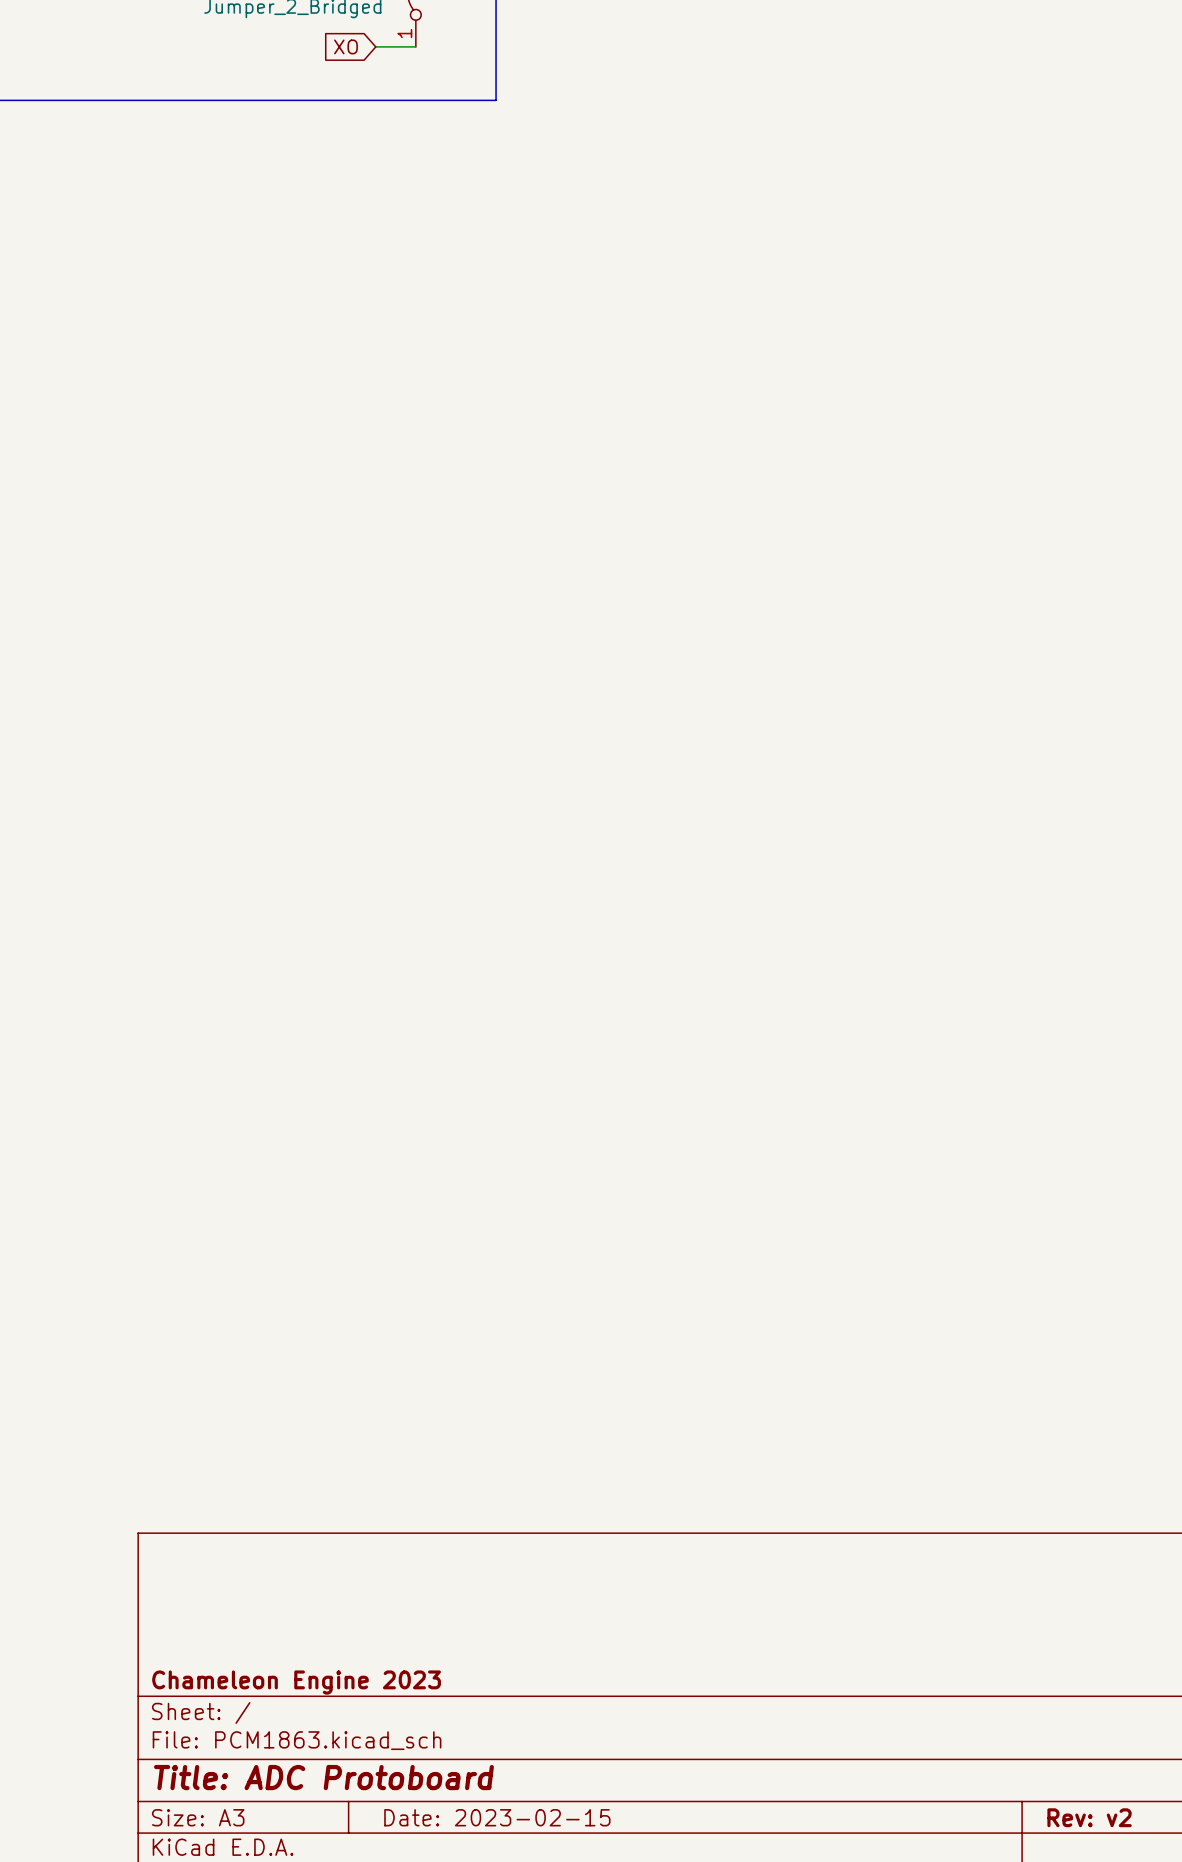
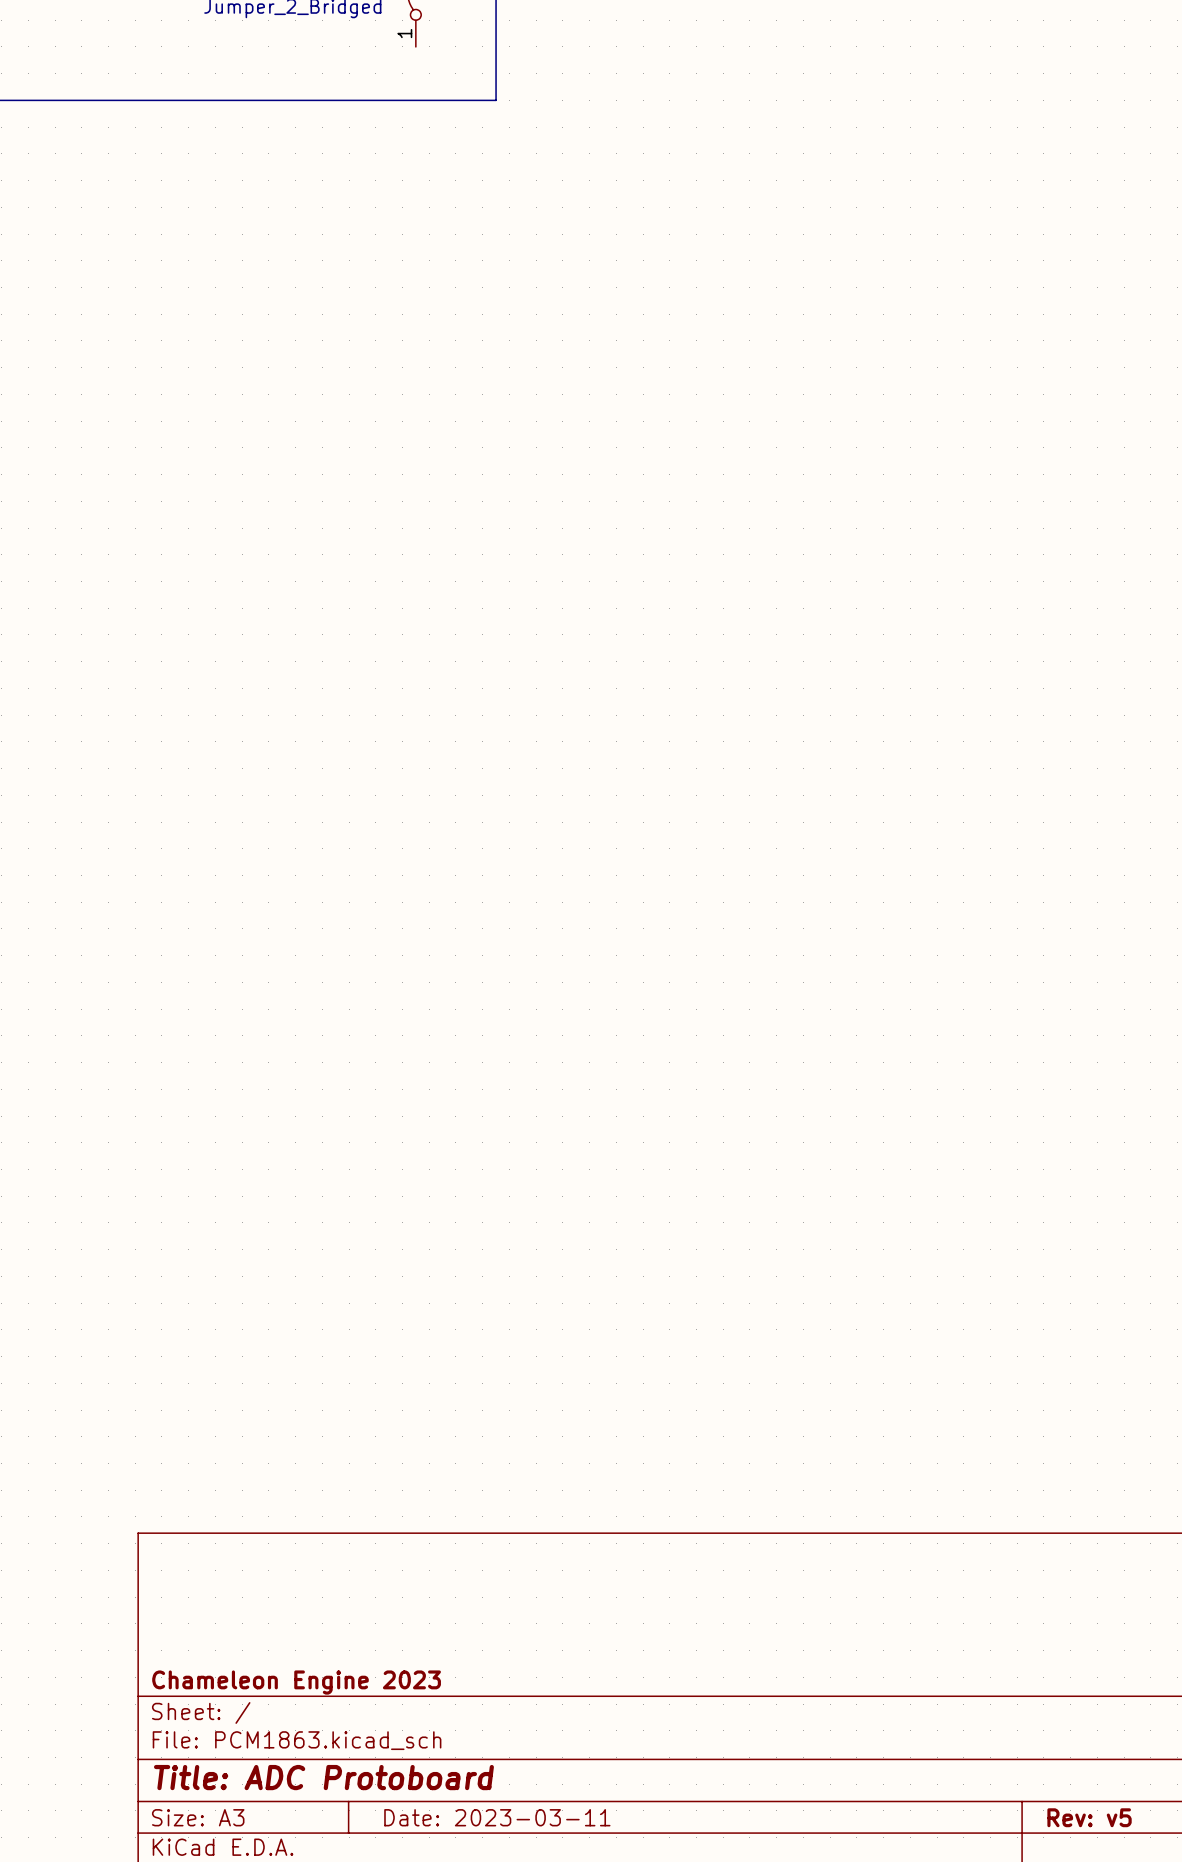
global label: XO (345, 46) -> none
wire: (375, 46) (415, 46) -> none
title block: Date: 2023-02-15 (497, 1817) -> Date: 2023-03-11 (497, 1817)
title block: Rev: v2 (1089, 1817) -> Rev: v5 (1089, 1817)

